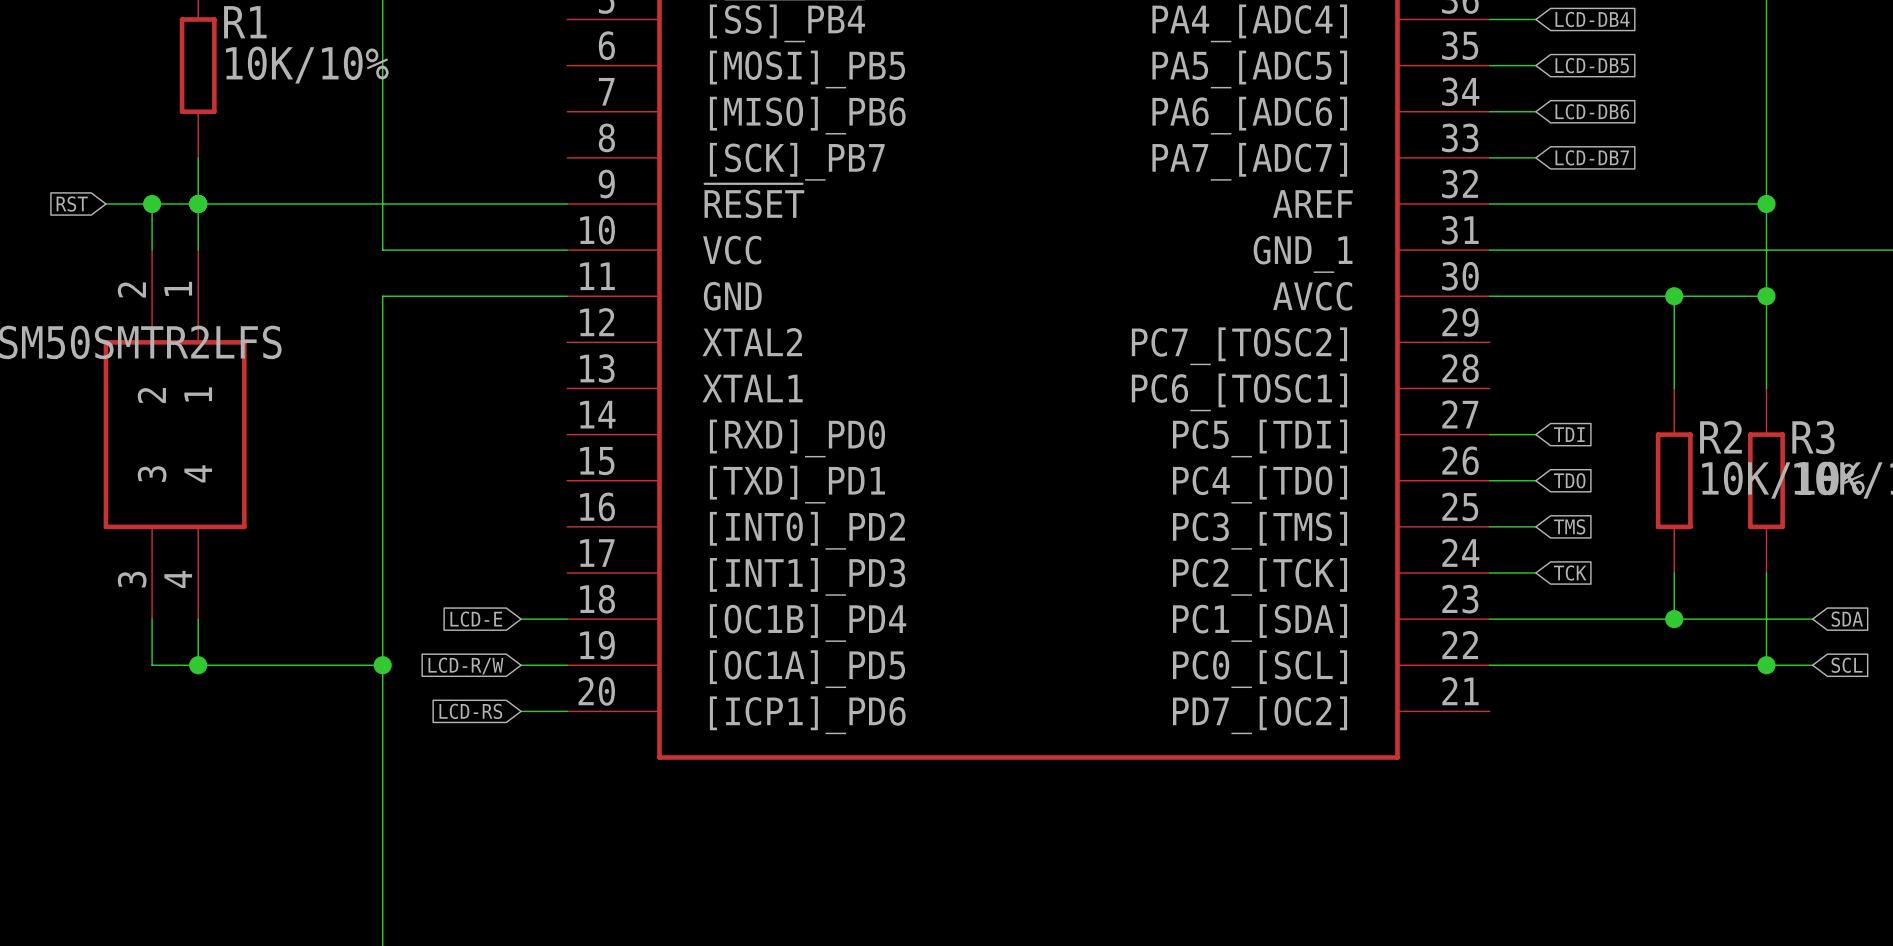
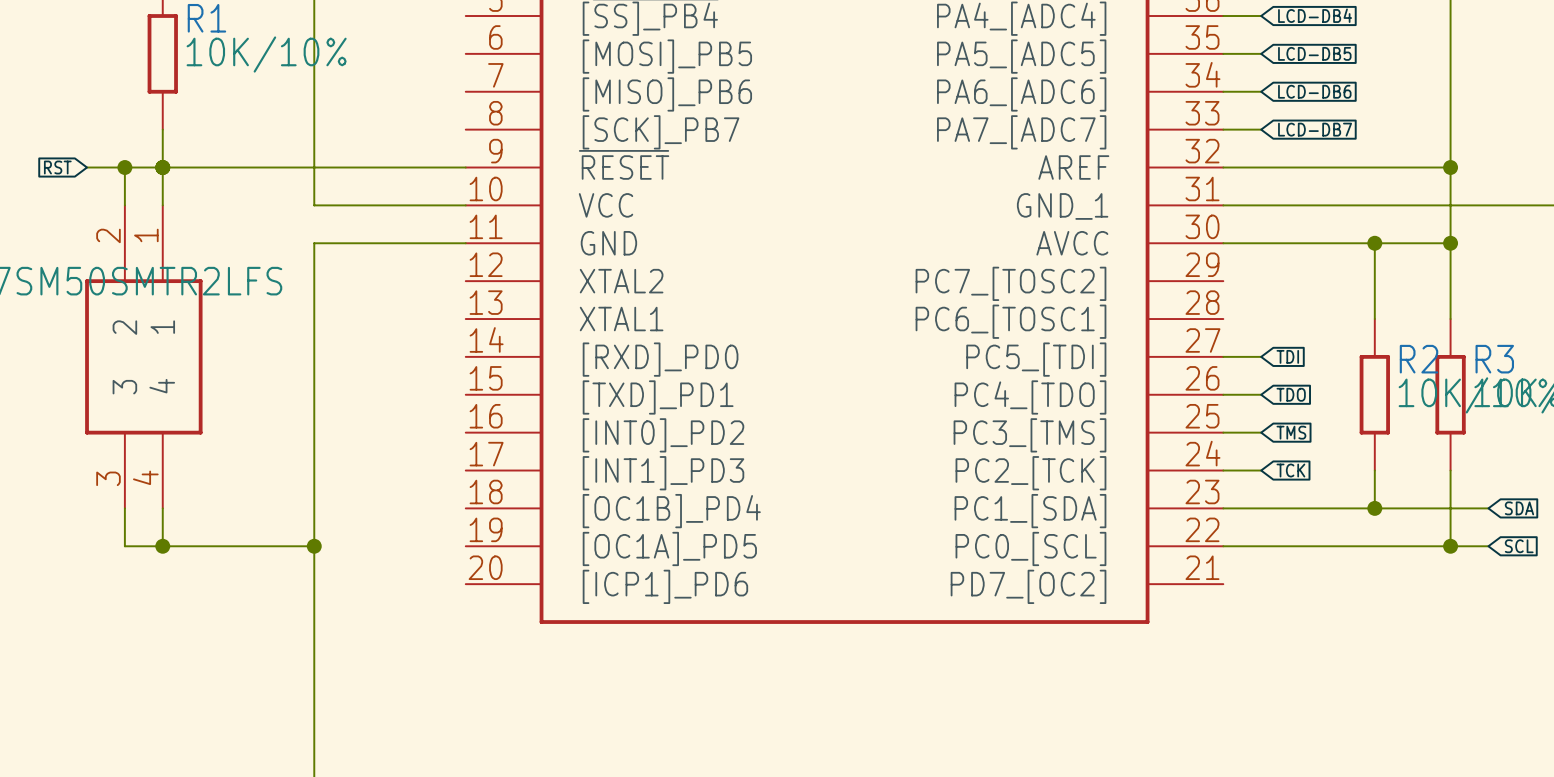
global label: LCD-E (476, 619) -> none
wire: (521, 619) (567, 619) -> none
wire: (521, 665) (567, 665) -> none
global label: LCD-R/W (465, 666) -> none
global label: LCD-RS (470, 711) -> none
wire: (521, 711) (567, 711) -> none

